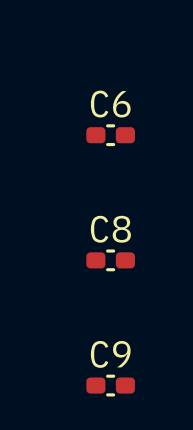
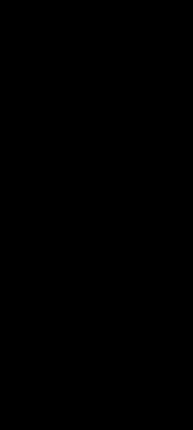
C6: (110, 135) -> none
C8: (110, 260) -> none
C9: (110, 385) -> none

